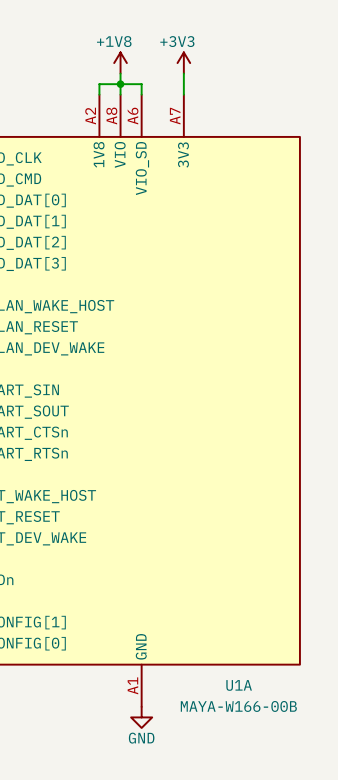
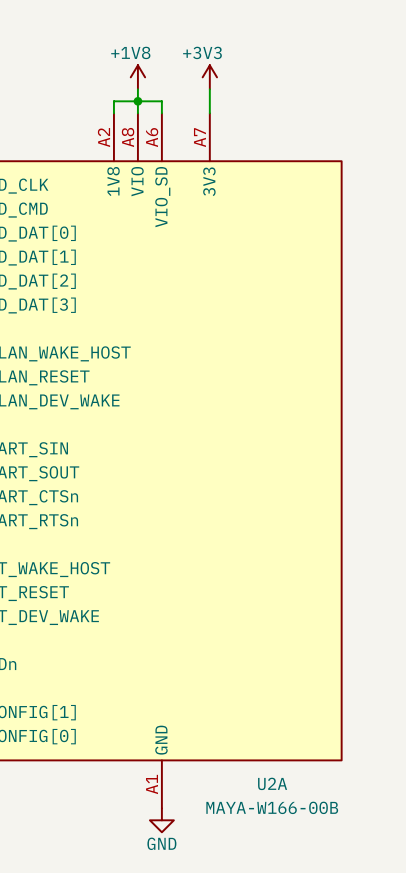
U1A name: U1A (239, 685) -> U2A (272, 783)

